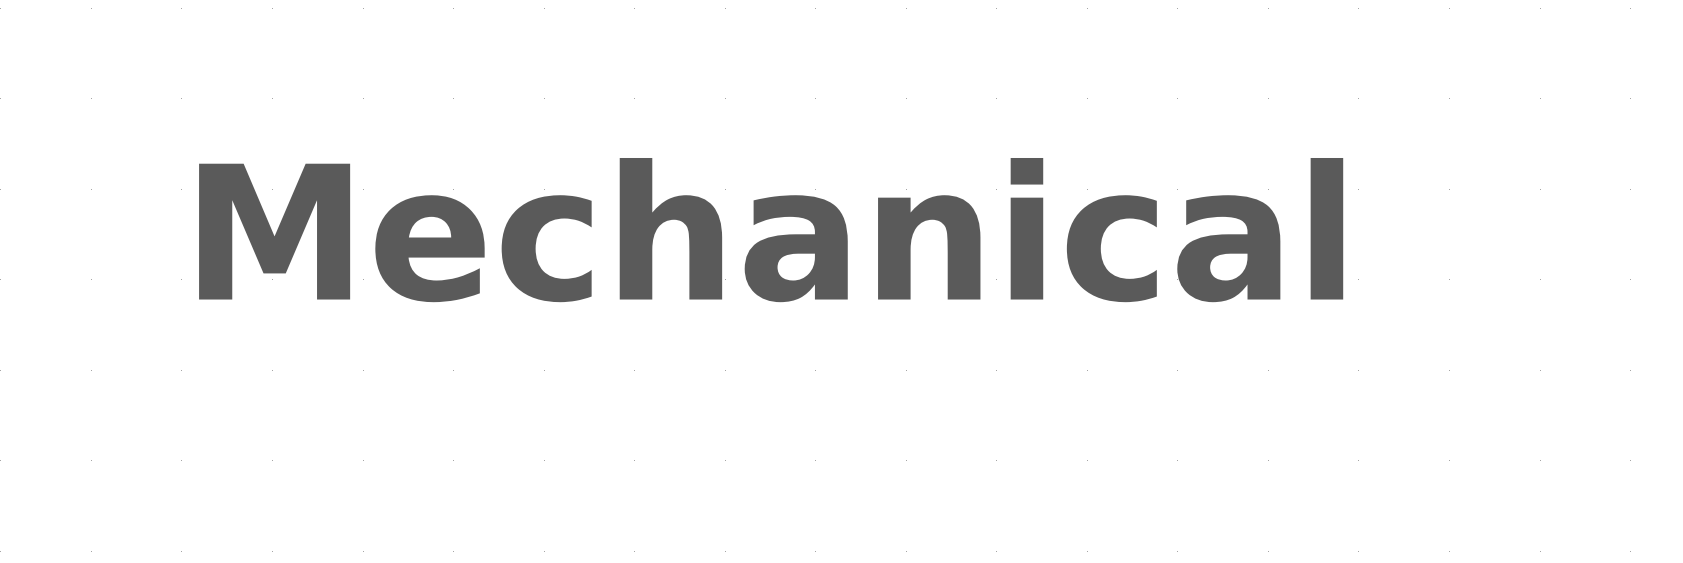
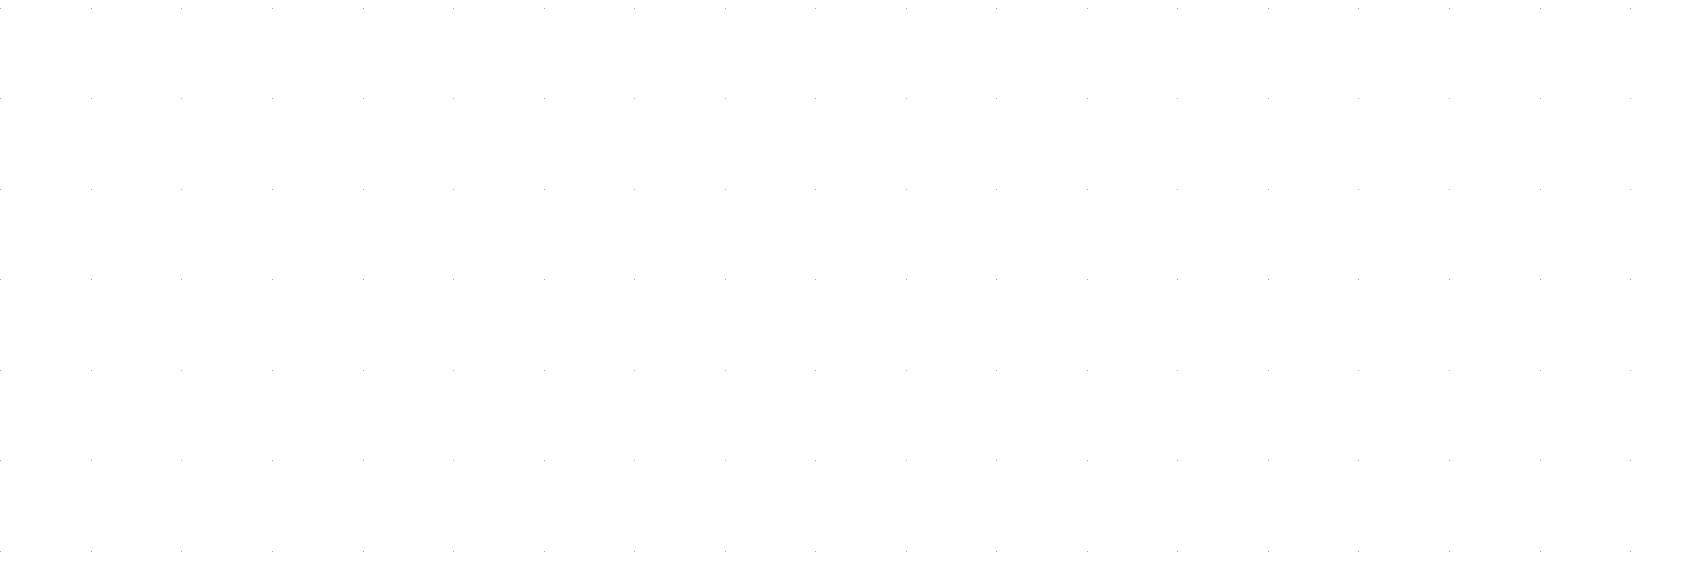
text: Mechanical (771, 230) -> none

